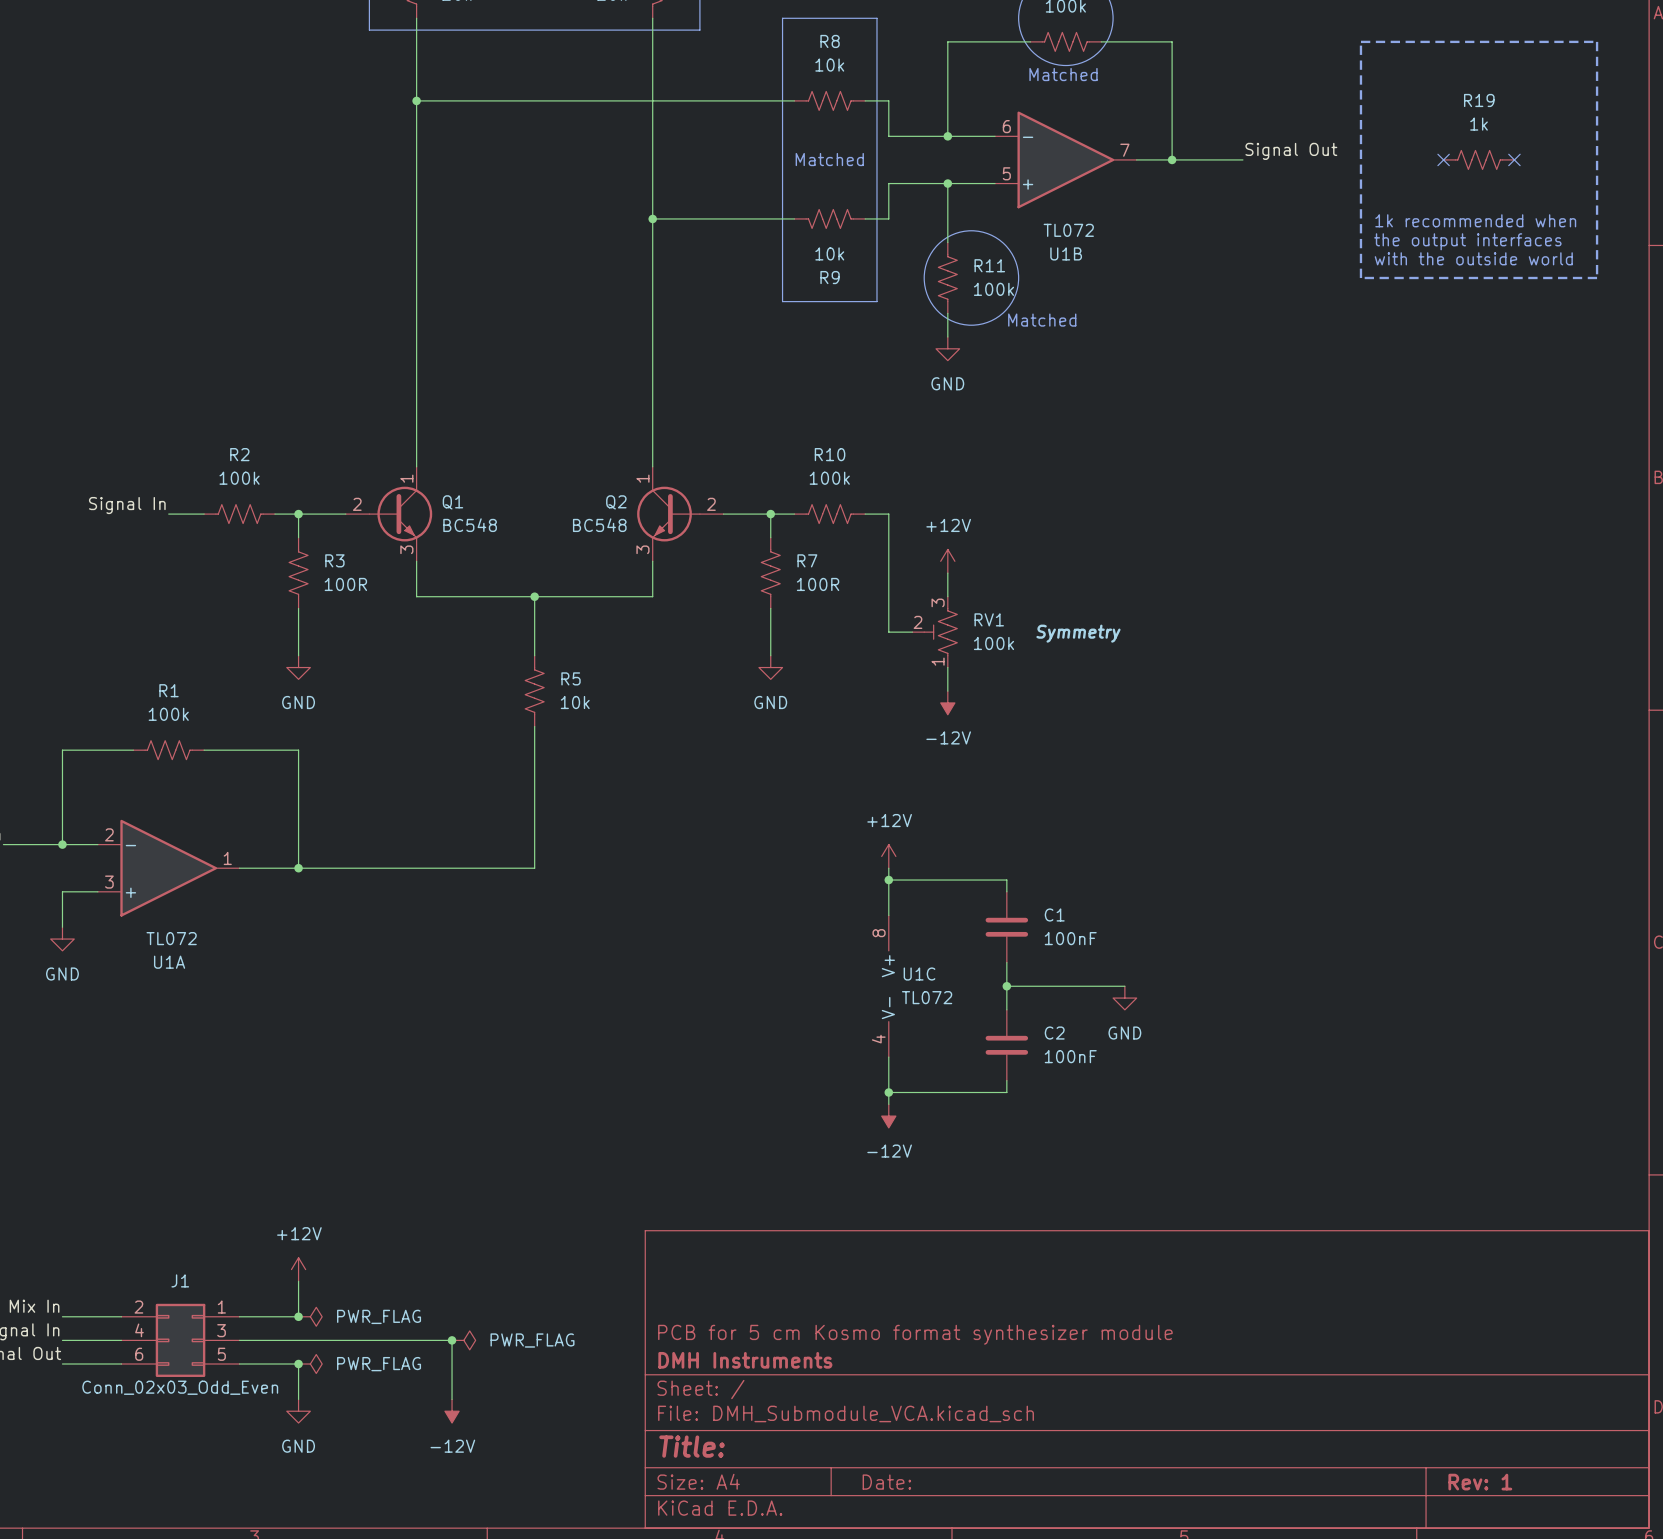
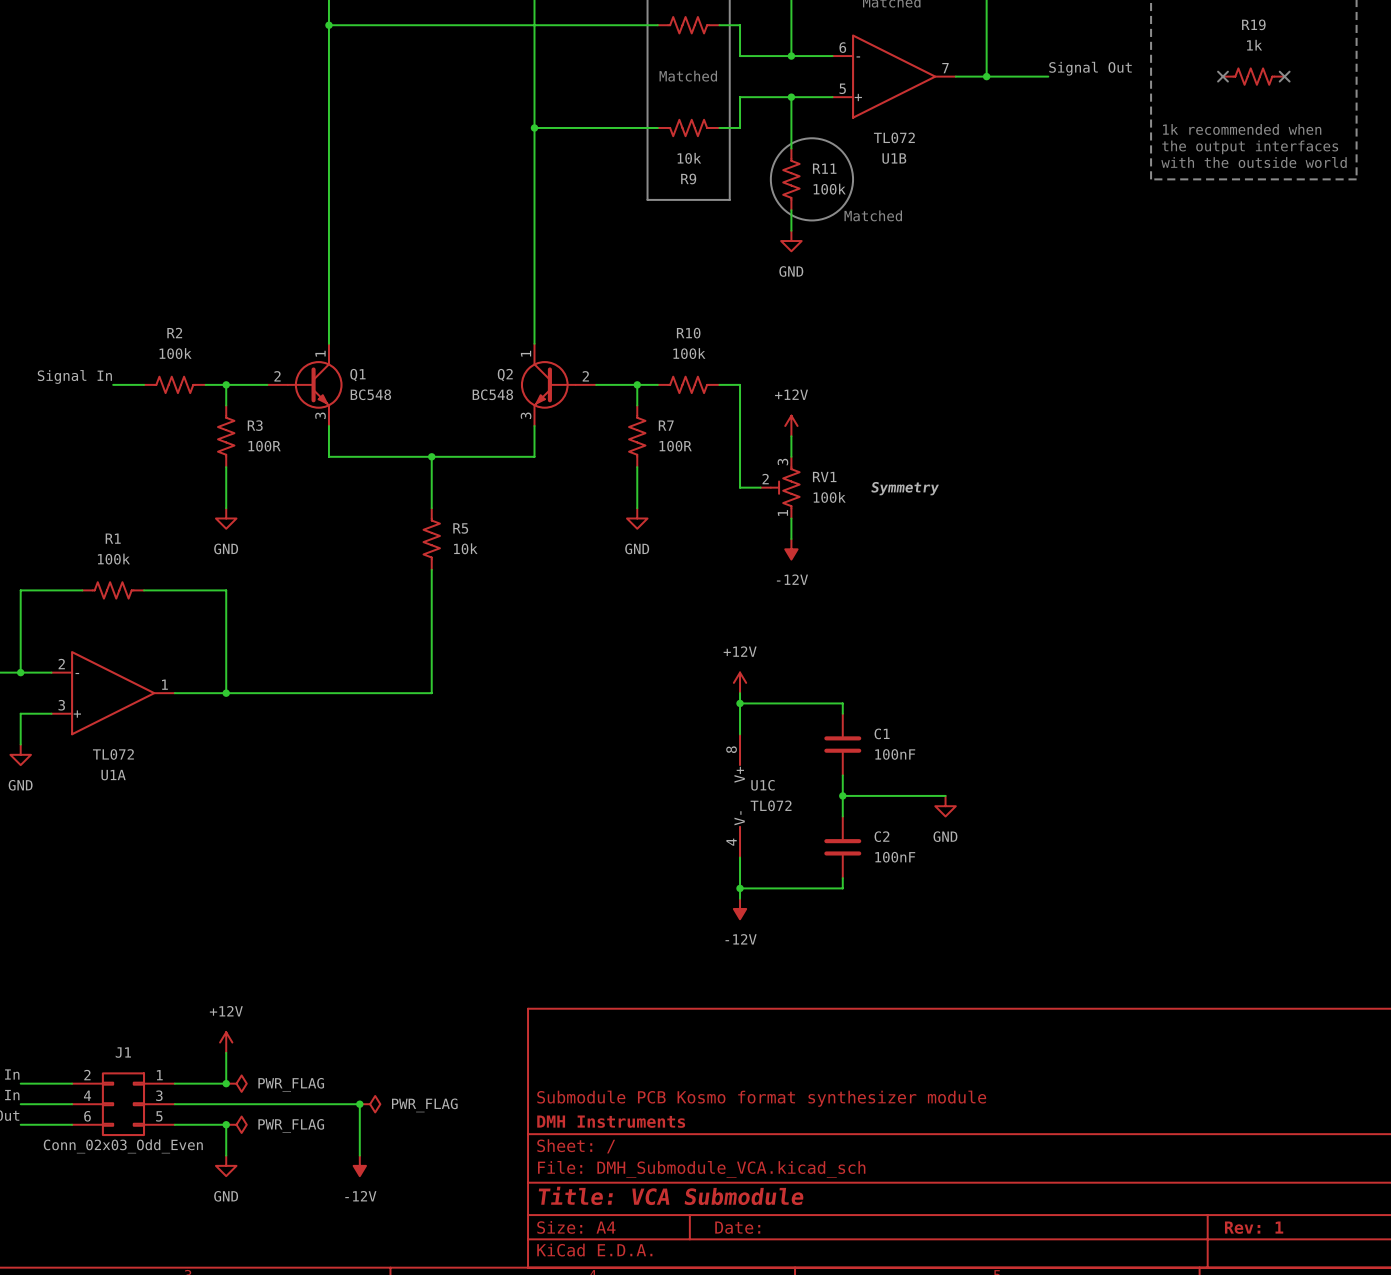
title block: PCB for 5 cm Kosmo format synthesizer module (915, 1334) -> Submodule PCB Kosmo format synthesizer module (761, 1098)
title block: Title: (692, 1446) -> Title: VCA Submodule (671, 1195)

